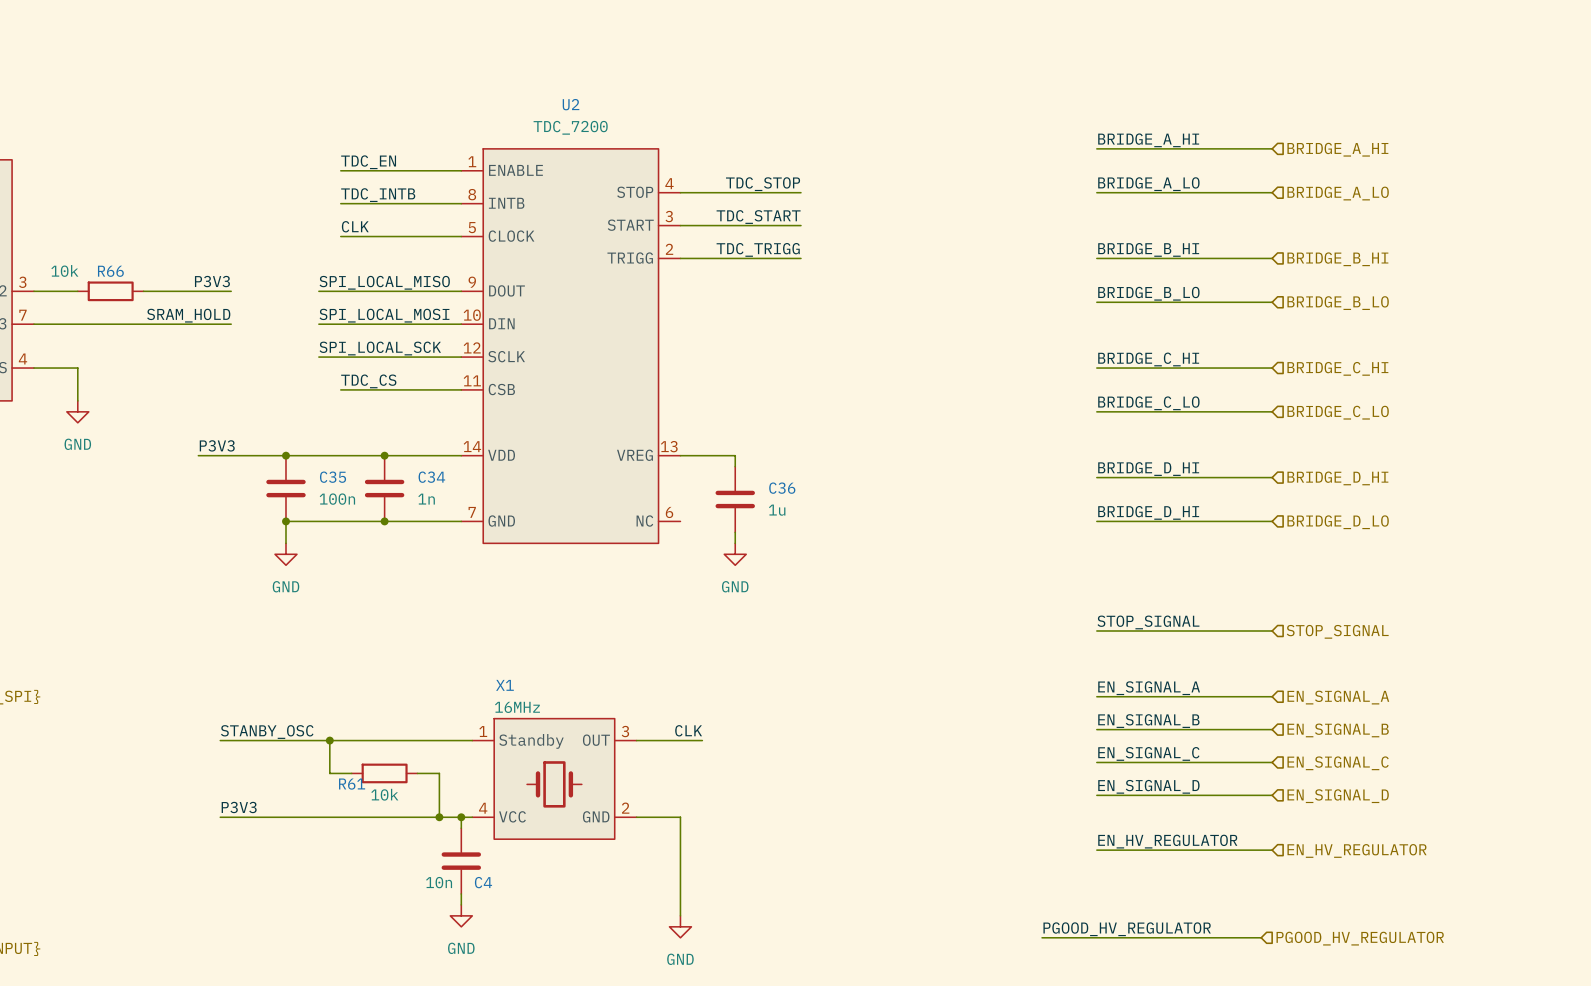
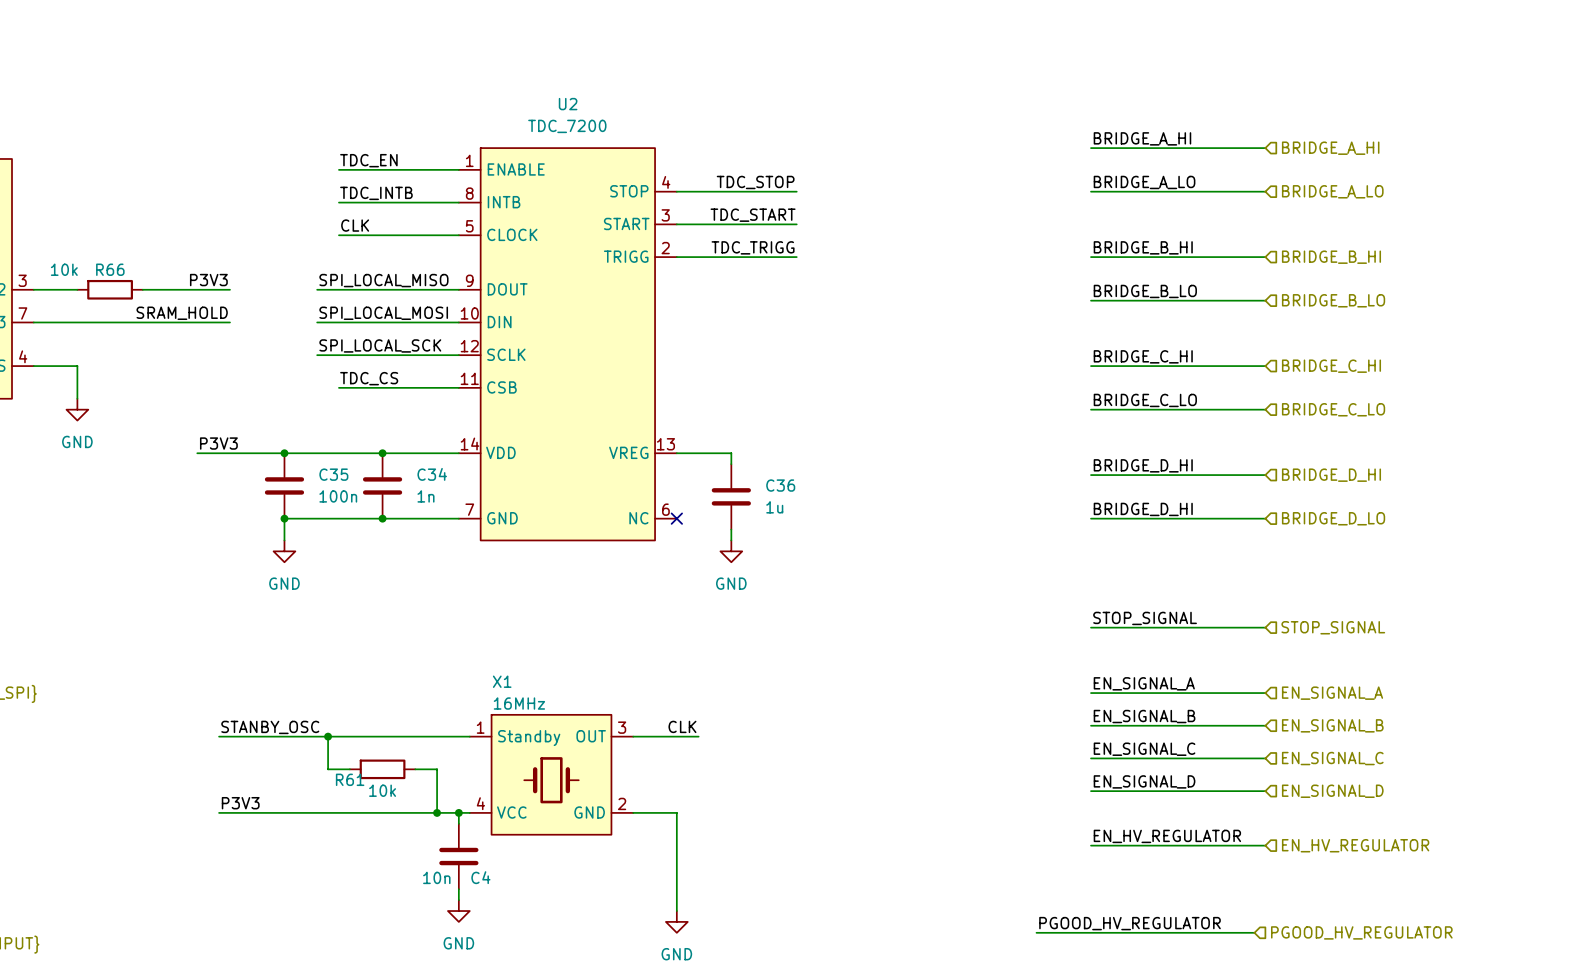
no-connect mark: none -> (676, 518)

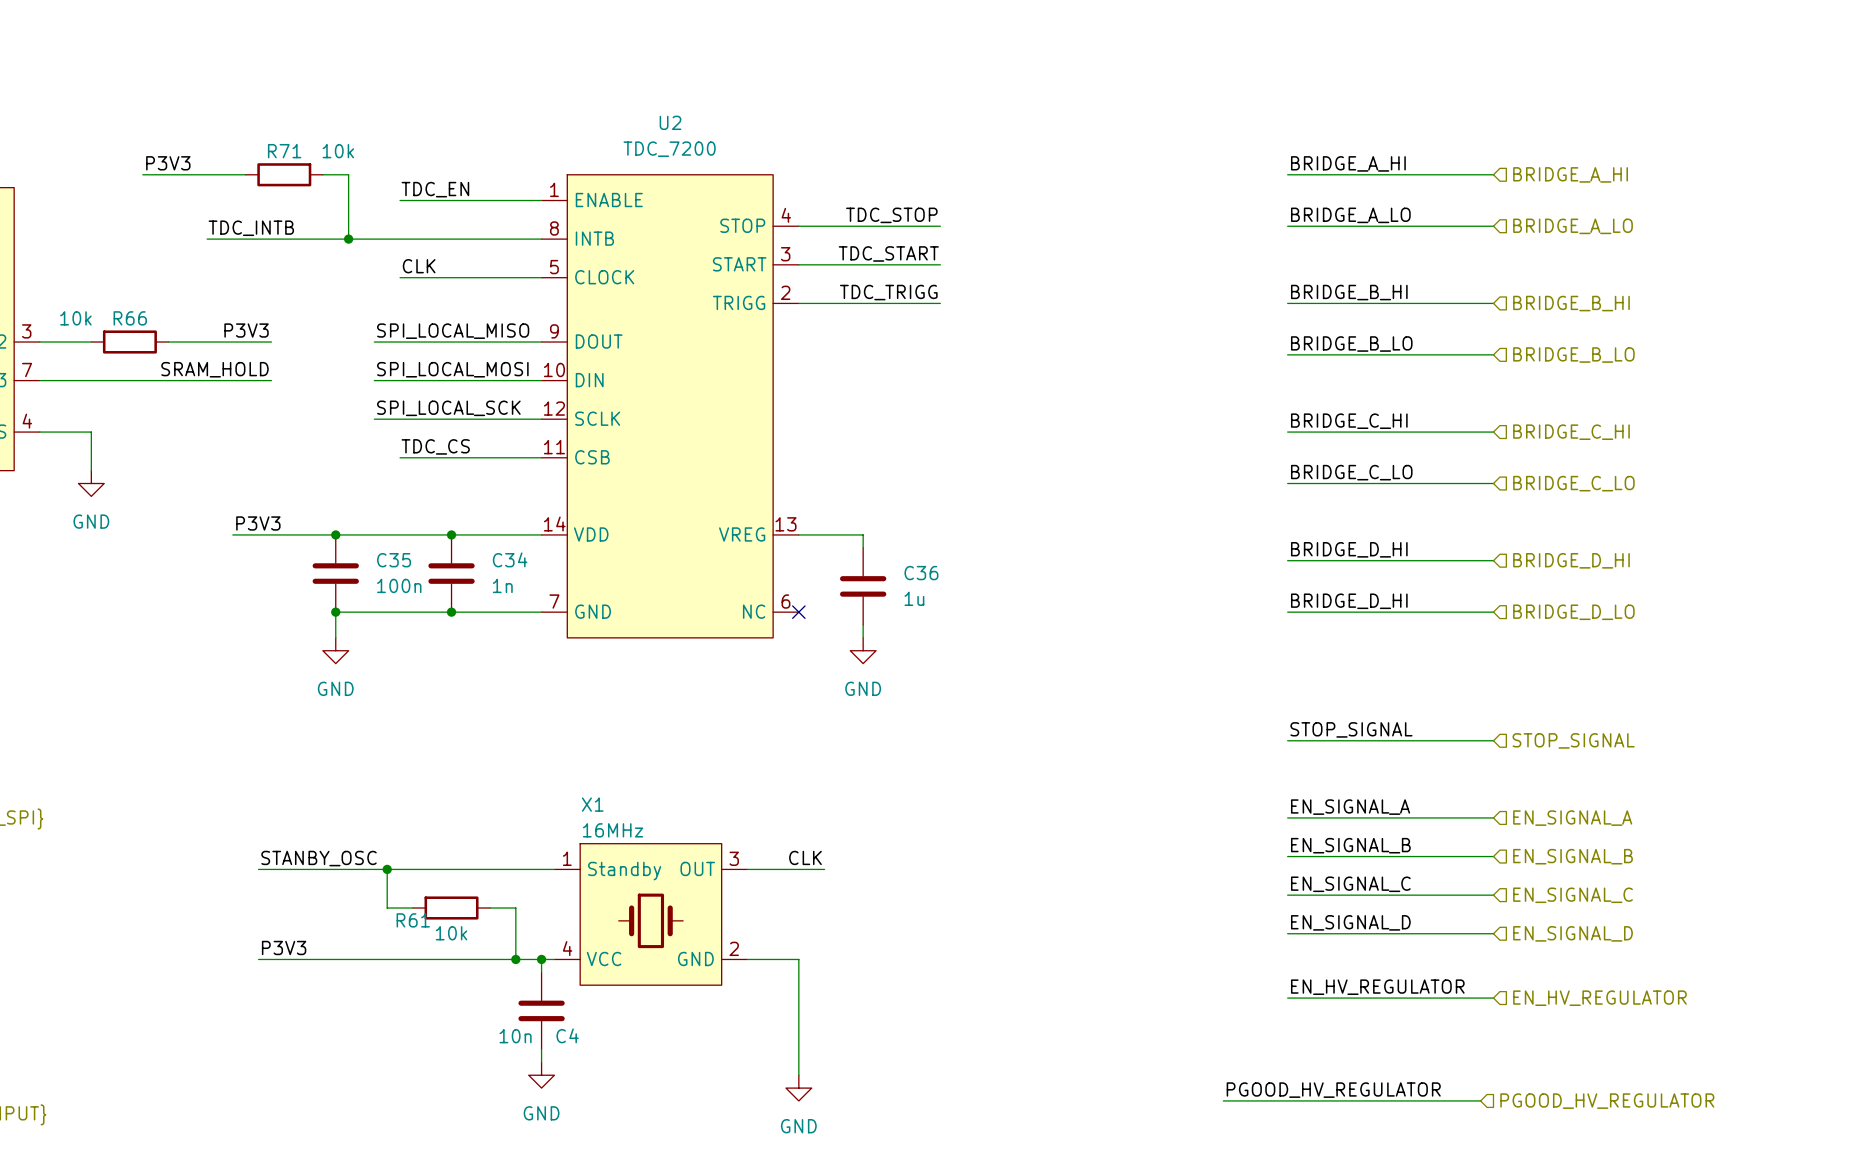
label: none -> P3V3 (168, 163)
wire: none -> (142, 174) (245, 174)
R71: none -> 10k (284, 174)
wire: none -> (322, 174) (348, 174) (348, 239)
label position: TDC_INTB (376, 193) -> TDC_INTB (251, 228)
wire: none -> (207, 239) (400, 239)
junction: none -> (348, 239)

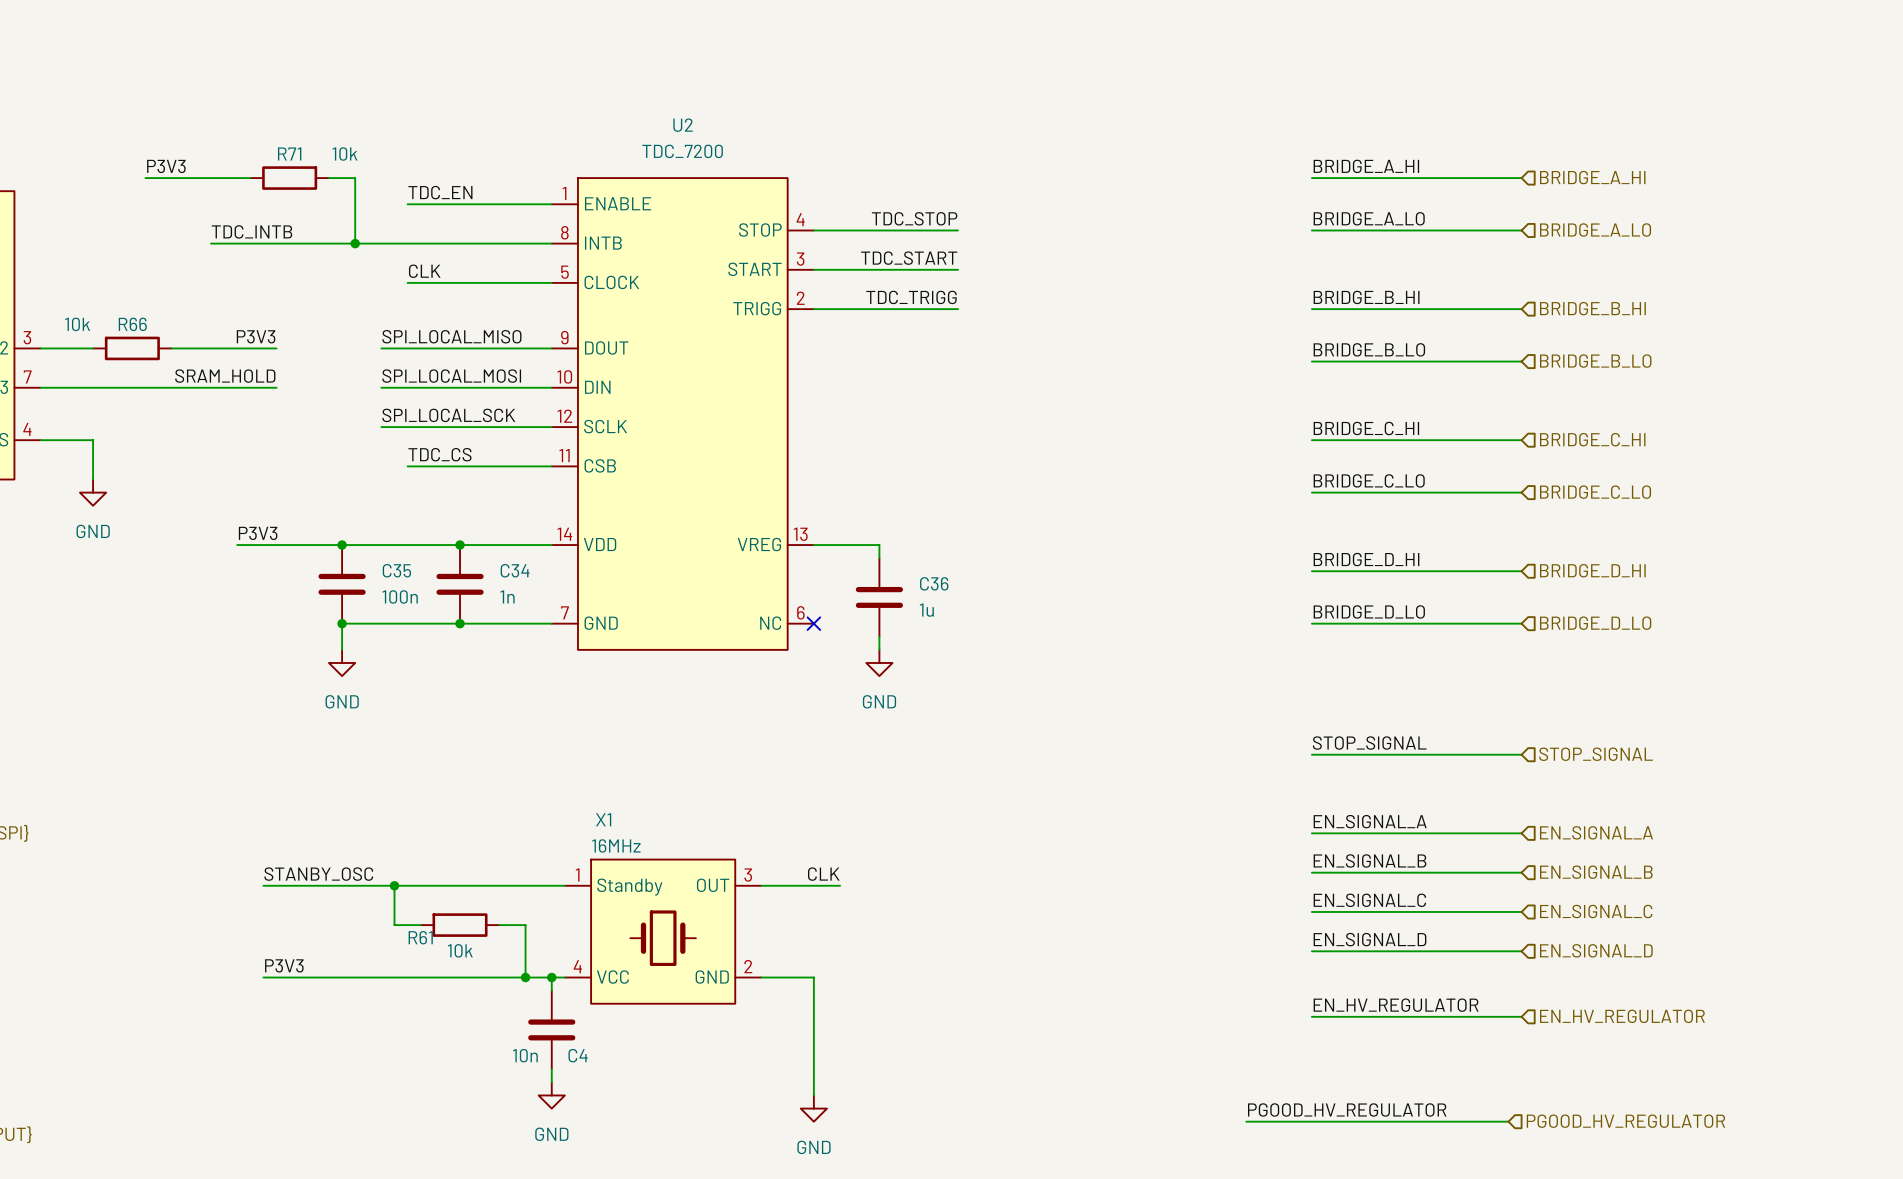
label: BRIDGE_D_HI (1349, 601) -> BRIDGE_D_LO (1369, 611)

